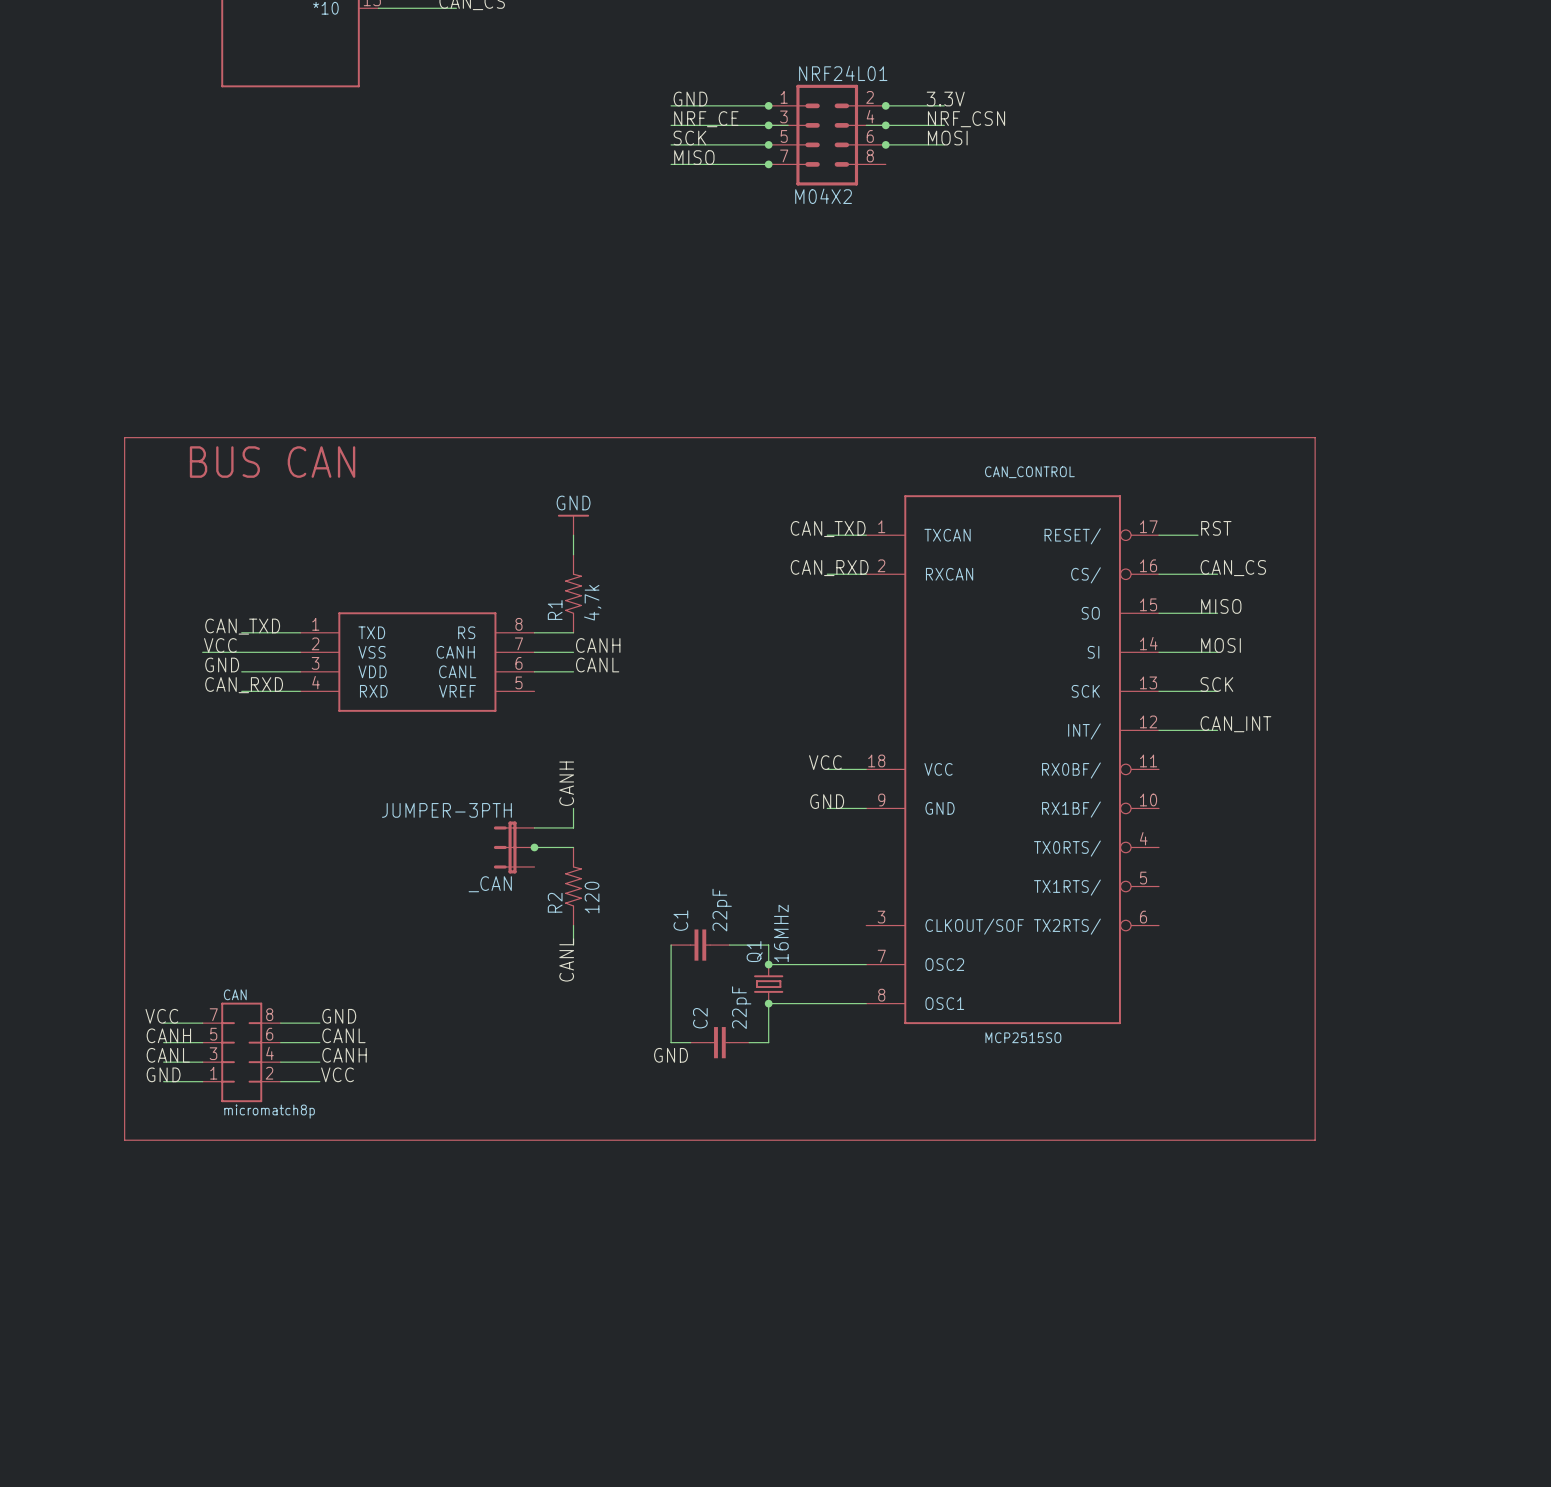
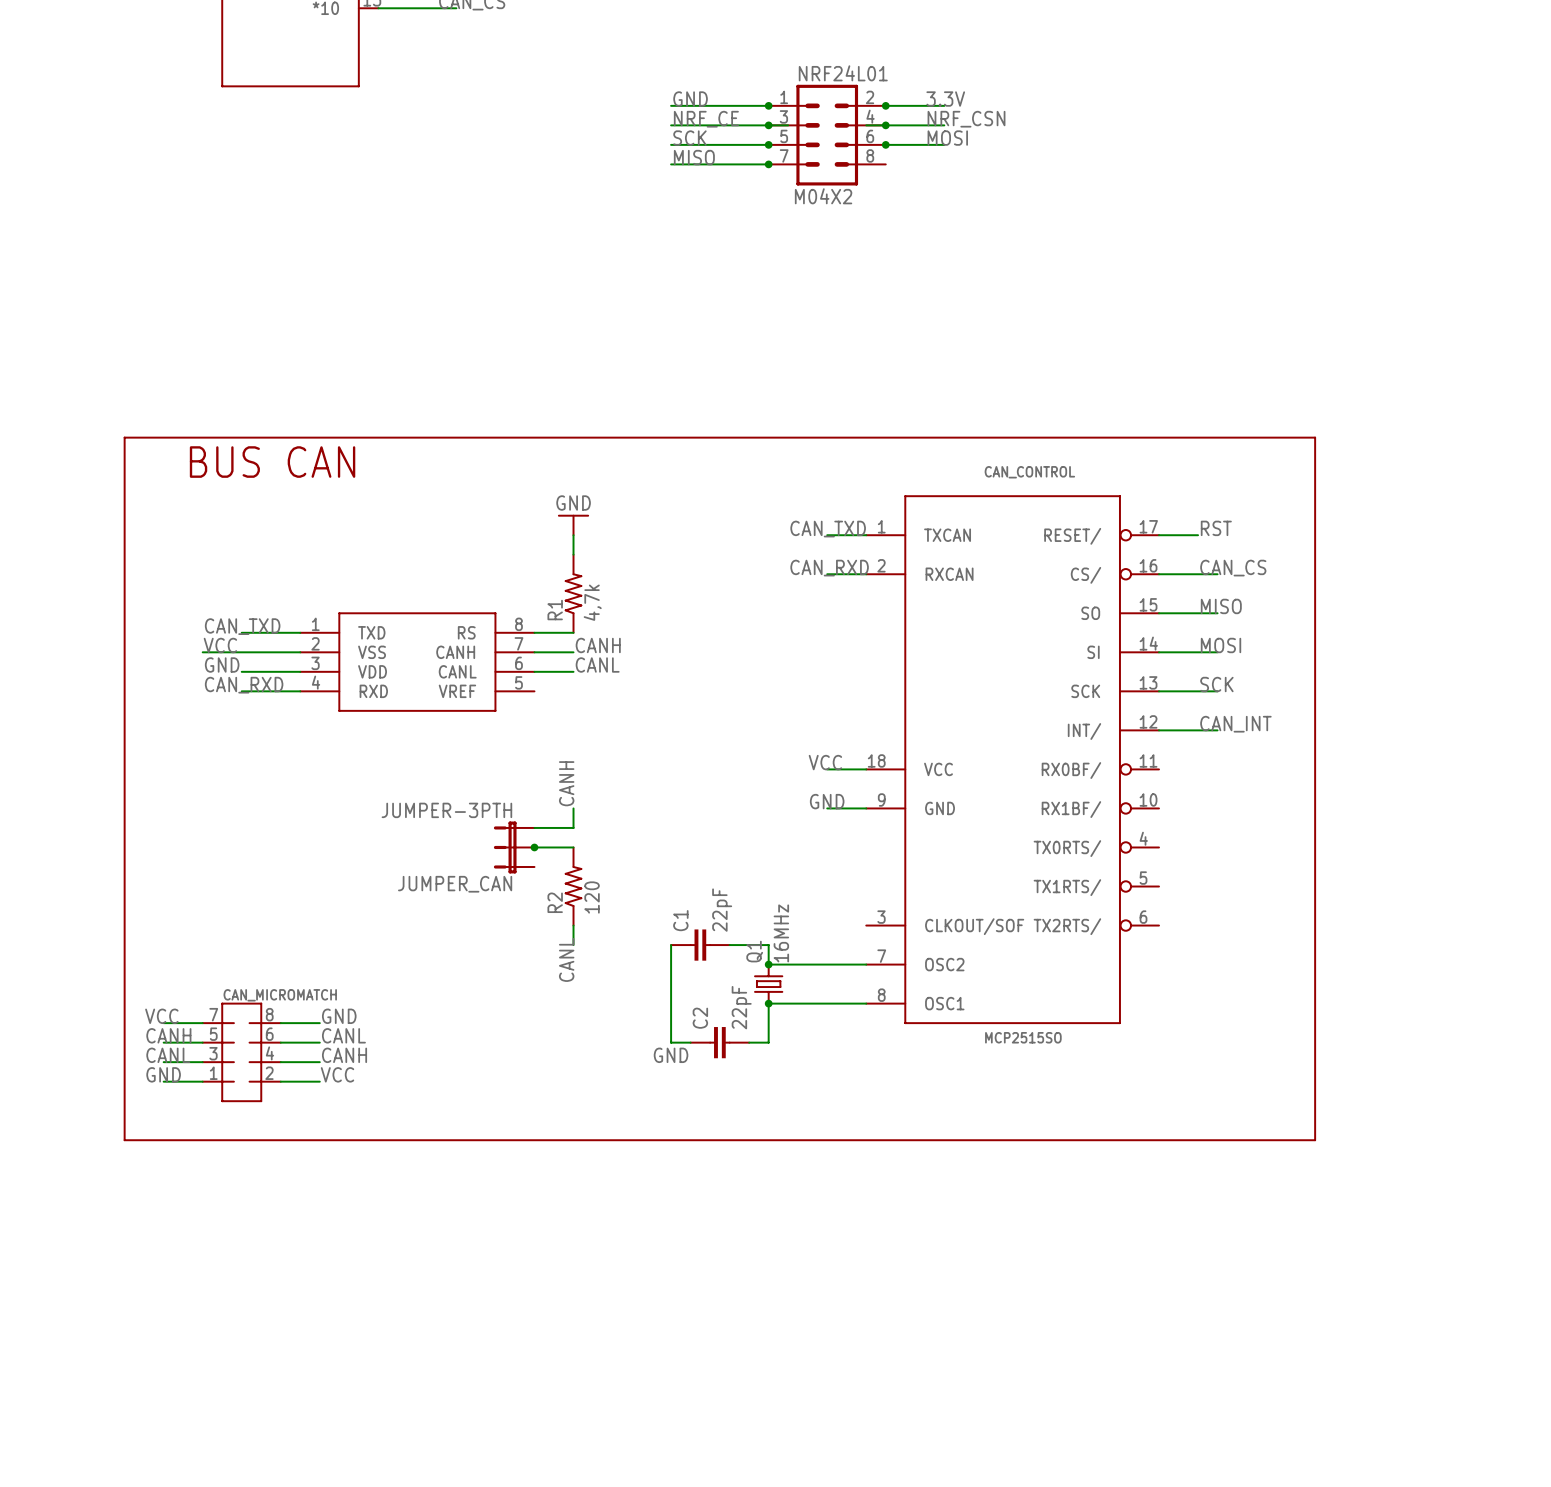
_CAN name: _CAN (490, 884) -> JUMPER_CAN (455, 884)
CAN name: CAN (235, 994) -> CAN_MICROMATCH (280, 995)
CAN value: micromatch8p (269, 1111) -> none

